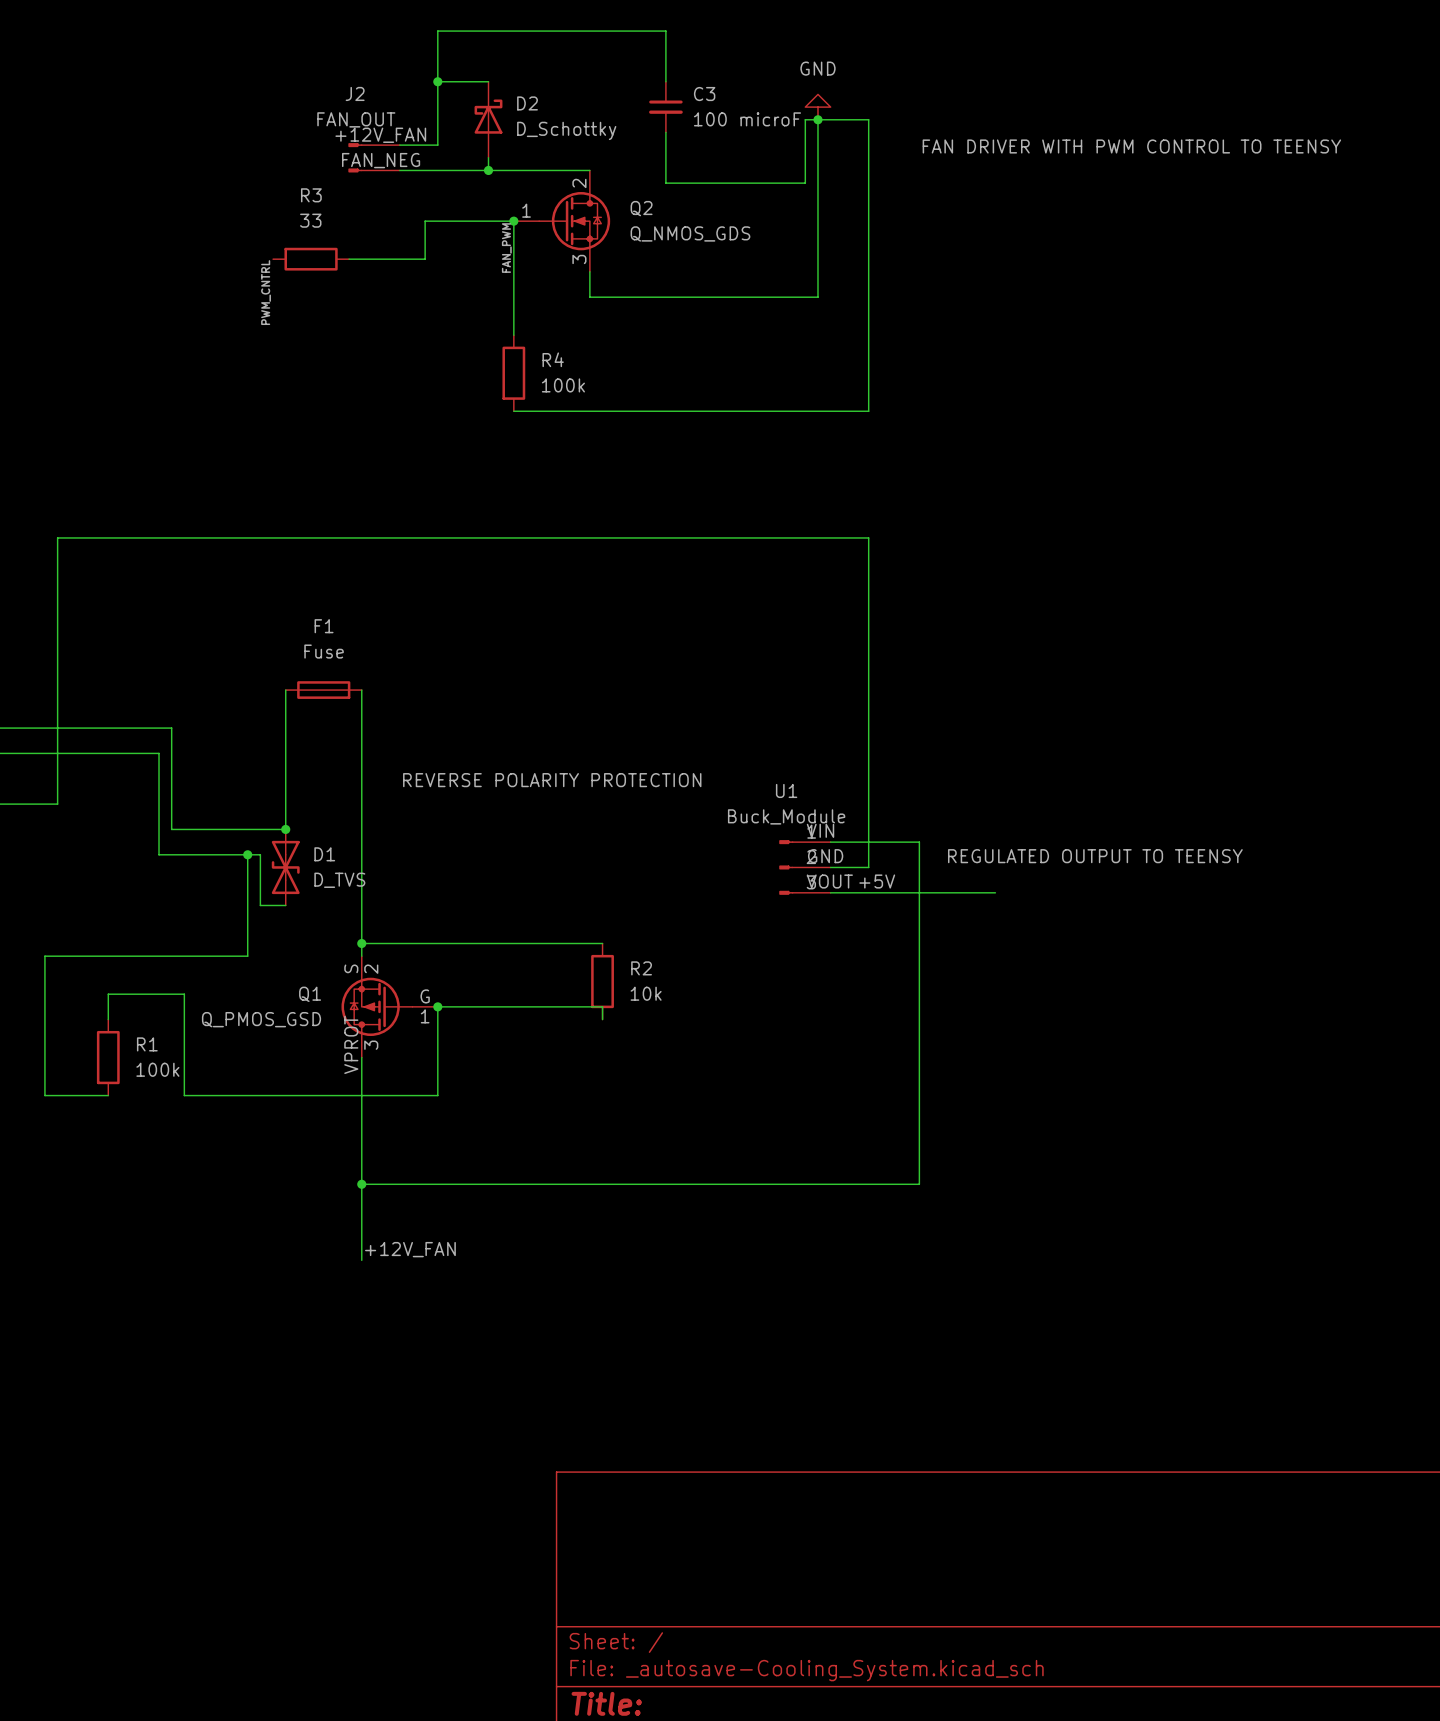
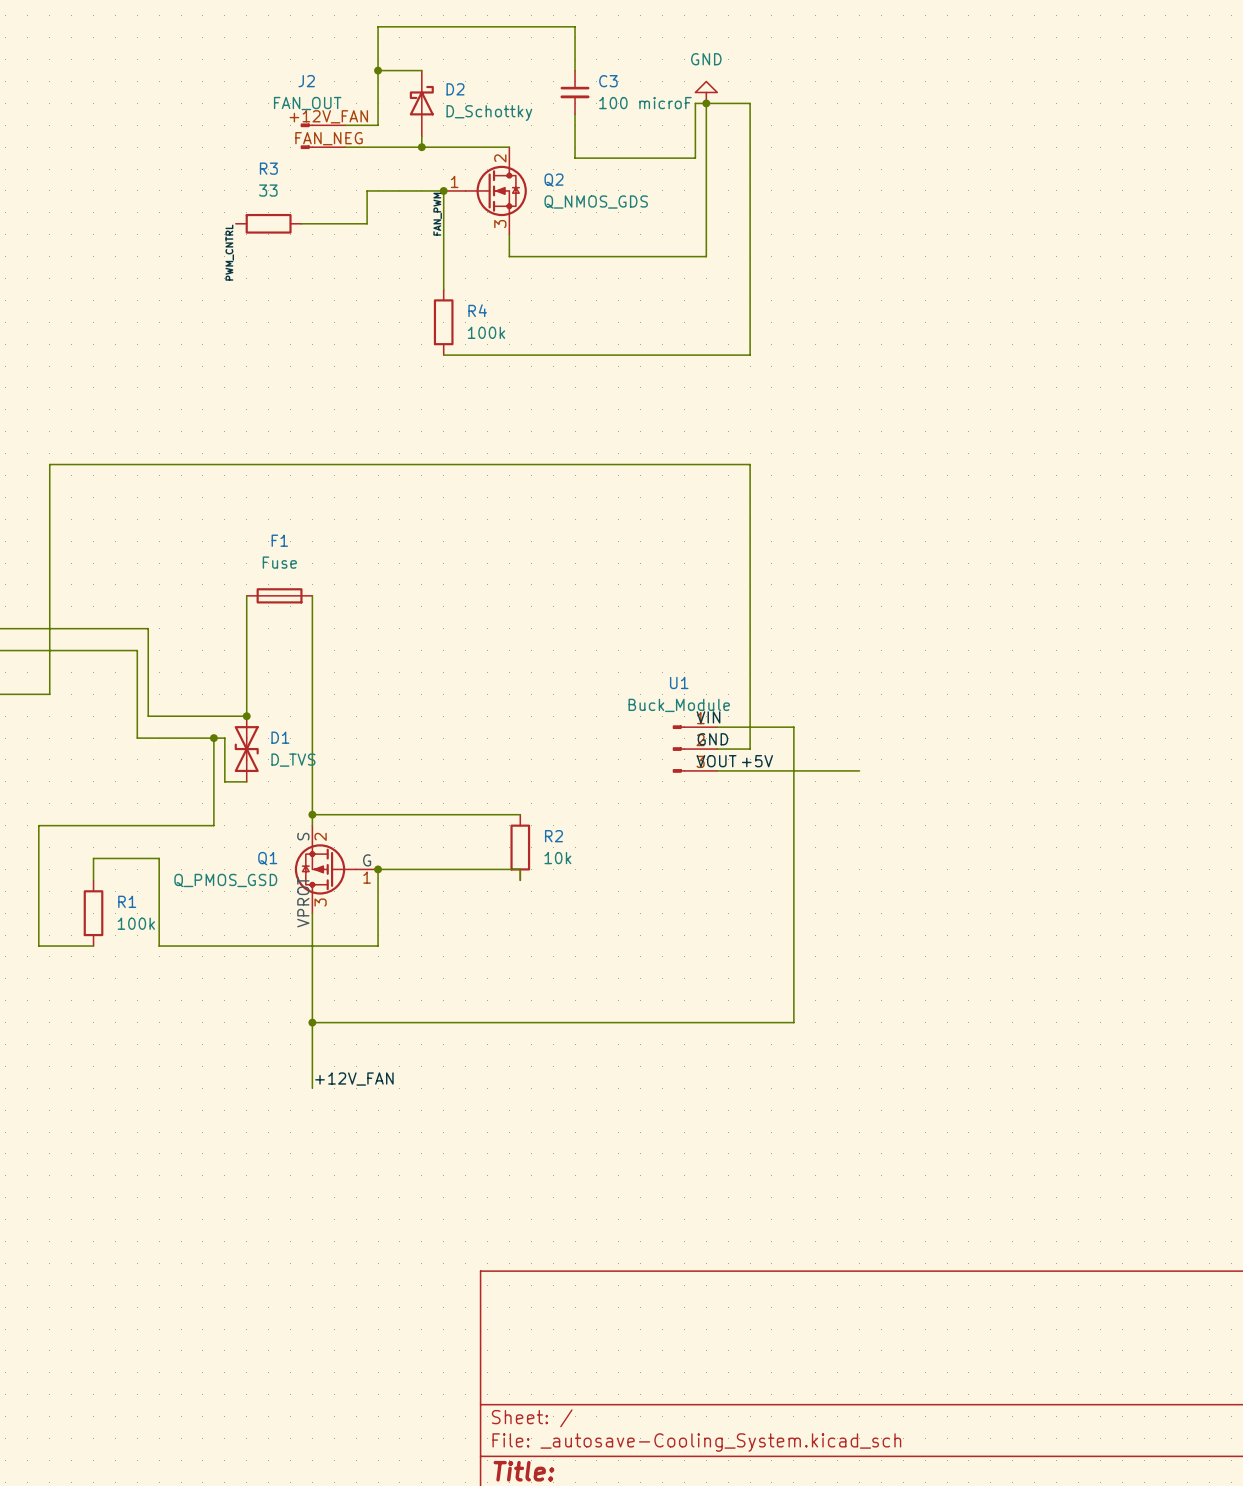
label: FAN DRIVER WITH PWM CONTROL TO TEENSY (1131, 146) -> none
label: REVERSE POLARITY PROTECTION (552, 780) -> none
label: REGULATED OUTPUT TO TEENSY (1095, 856) -> none

